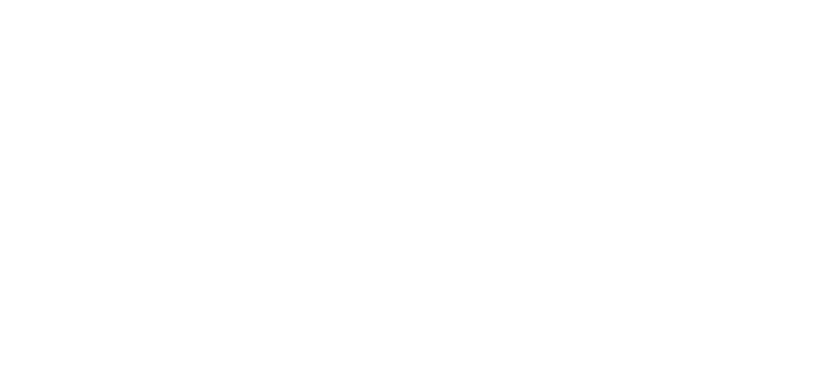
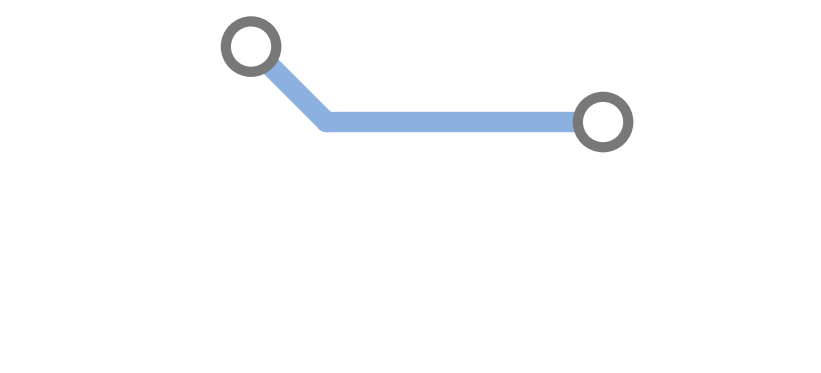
track: none -> (251, 46) (326, 122) (603, 122)
via: none -> (251, 46)
via: none -> (603, 122)

